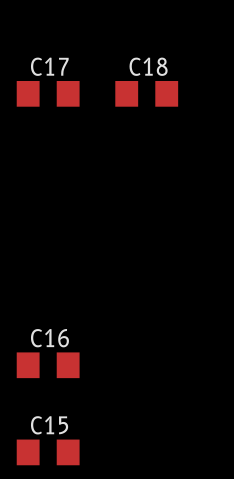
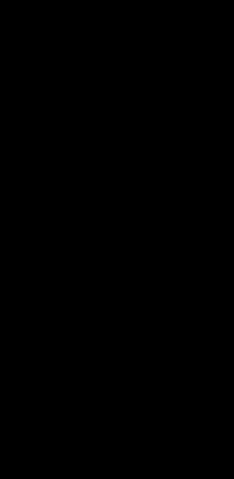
C17: (48, 93) -> none
C18: (146, 93) -> none
C16: (48, 365) -> none
C15: (48, 452) -> none

